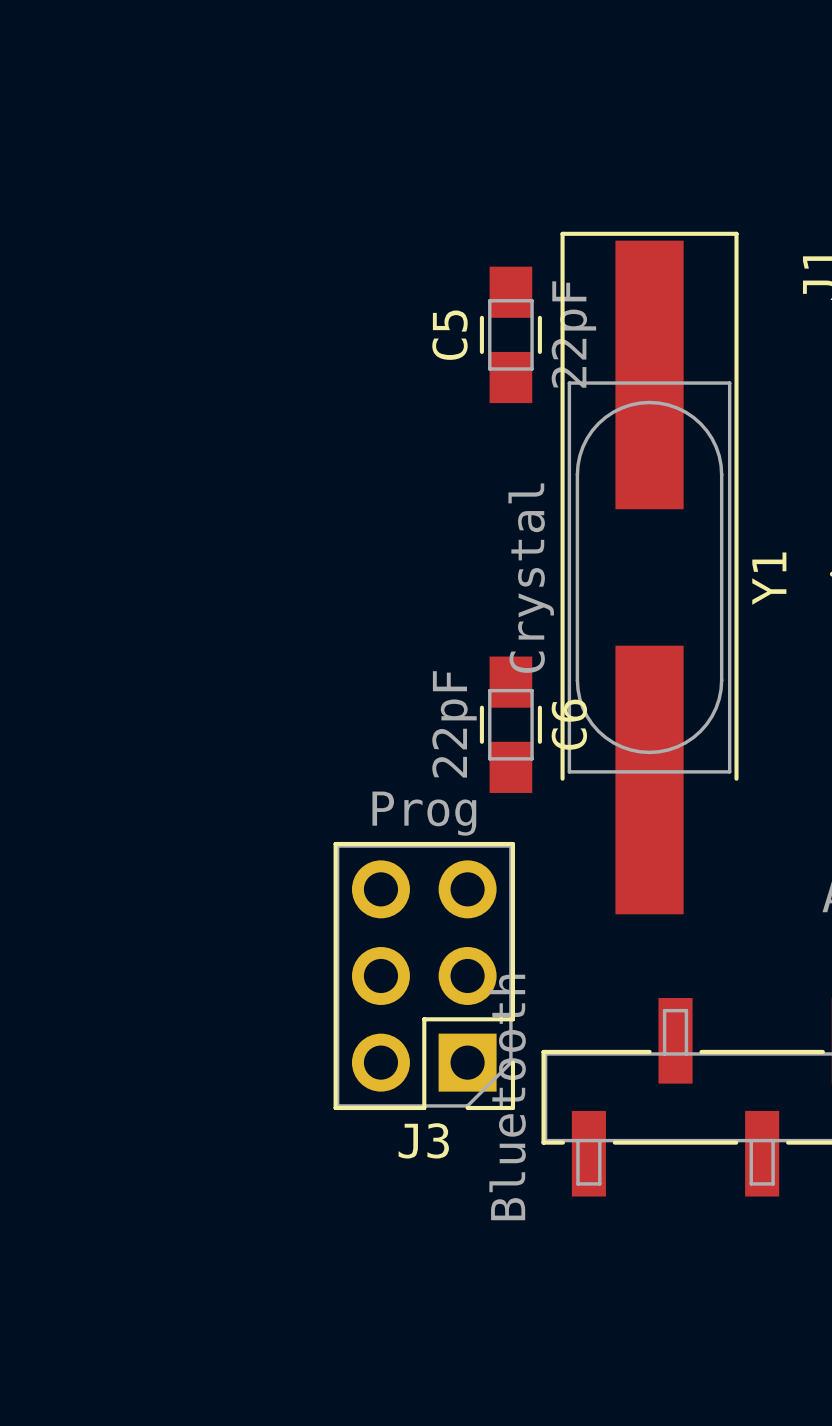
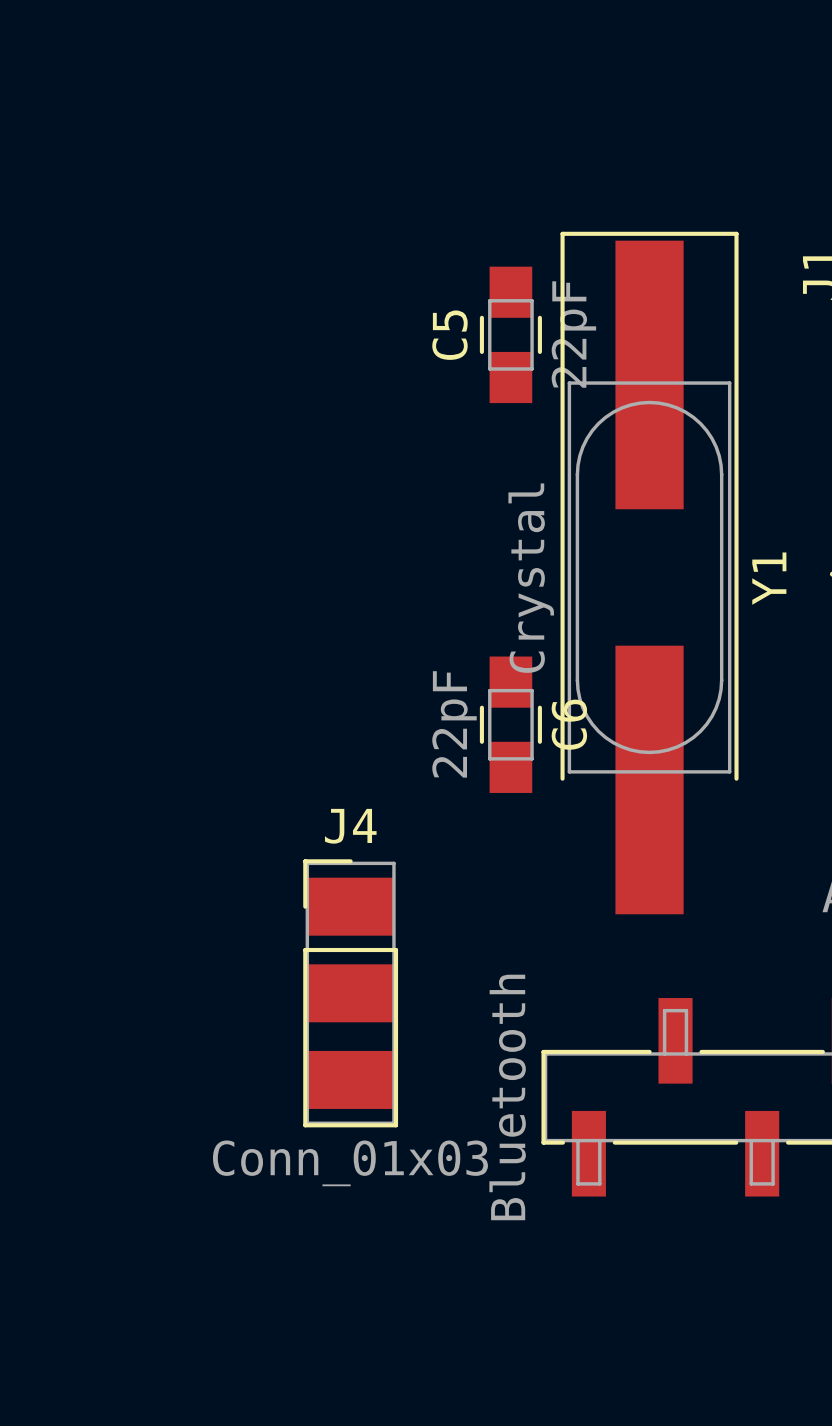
J3: Prog (424, 975) -> none
J4: none -> Conn_01x03 (350, 993)

